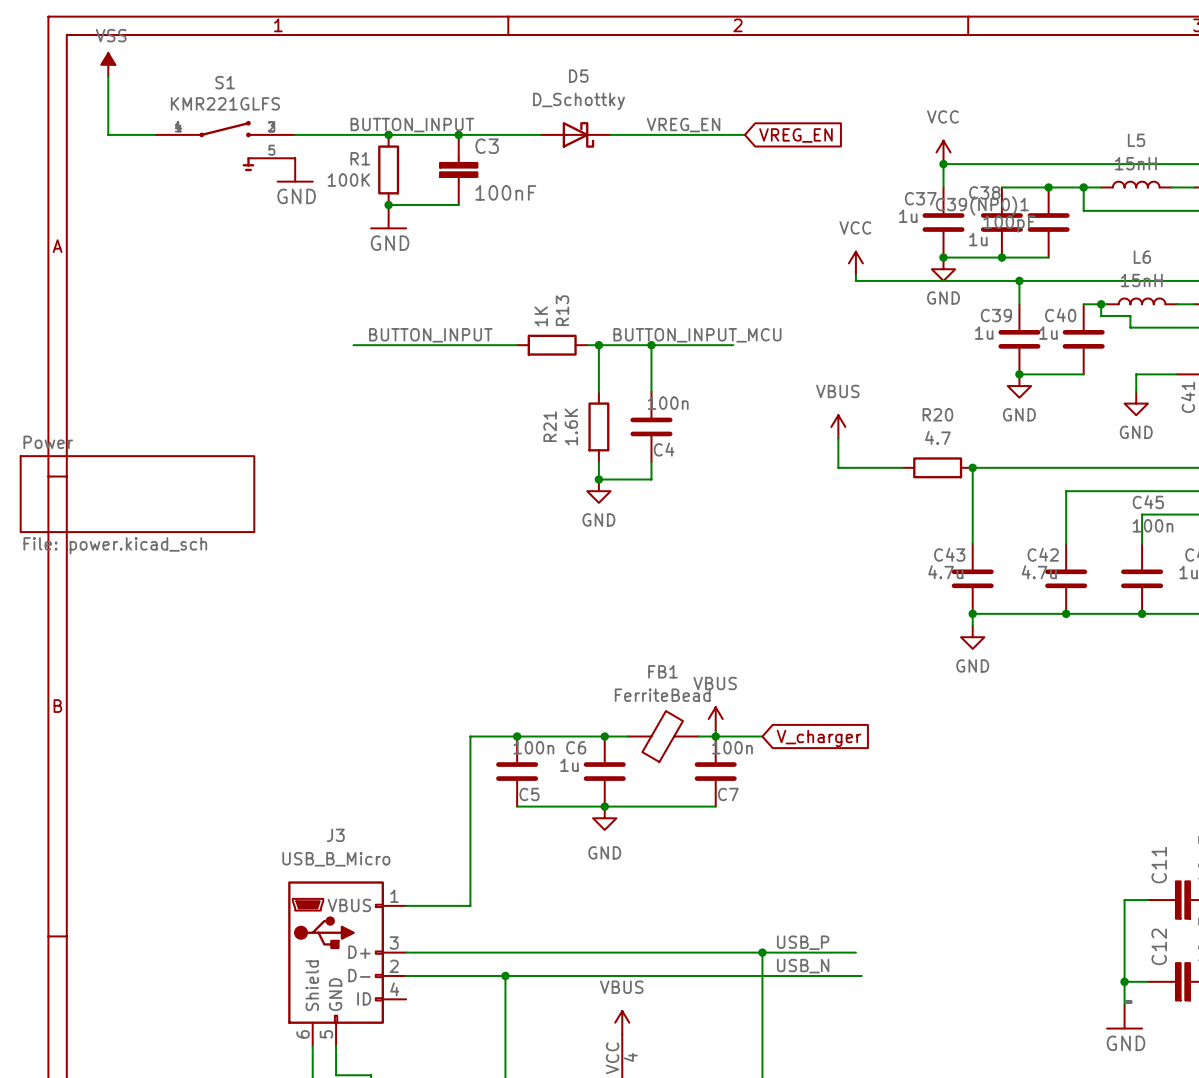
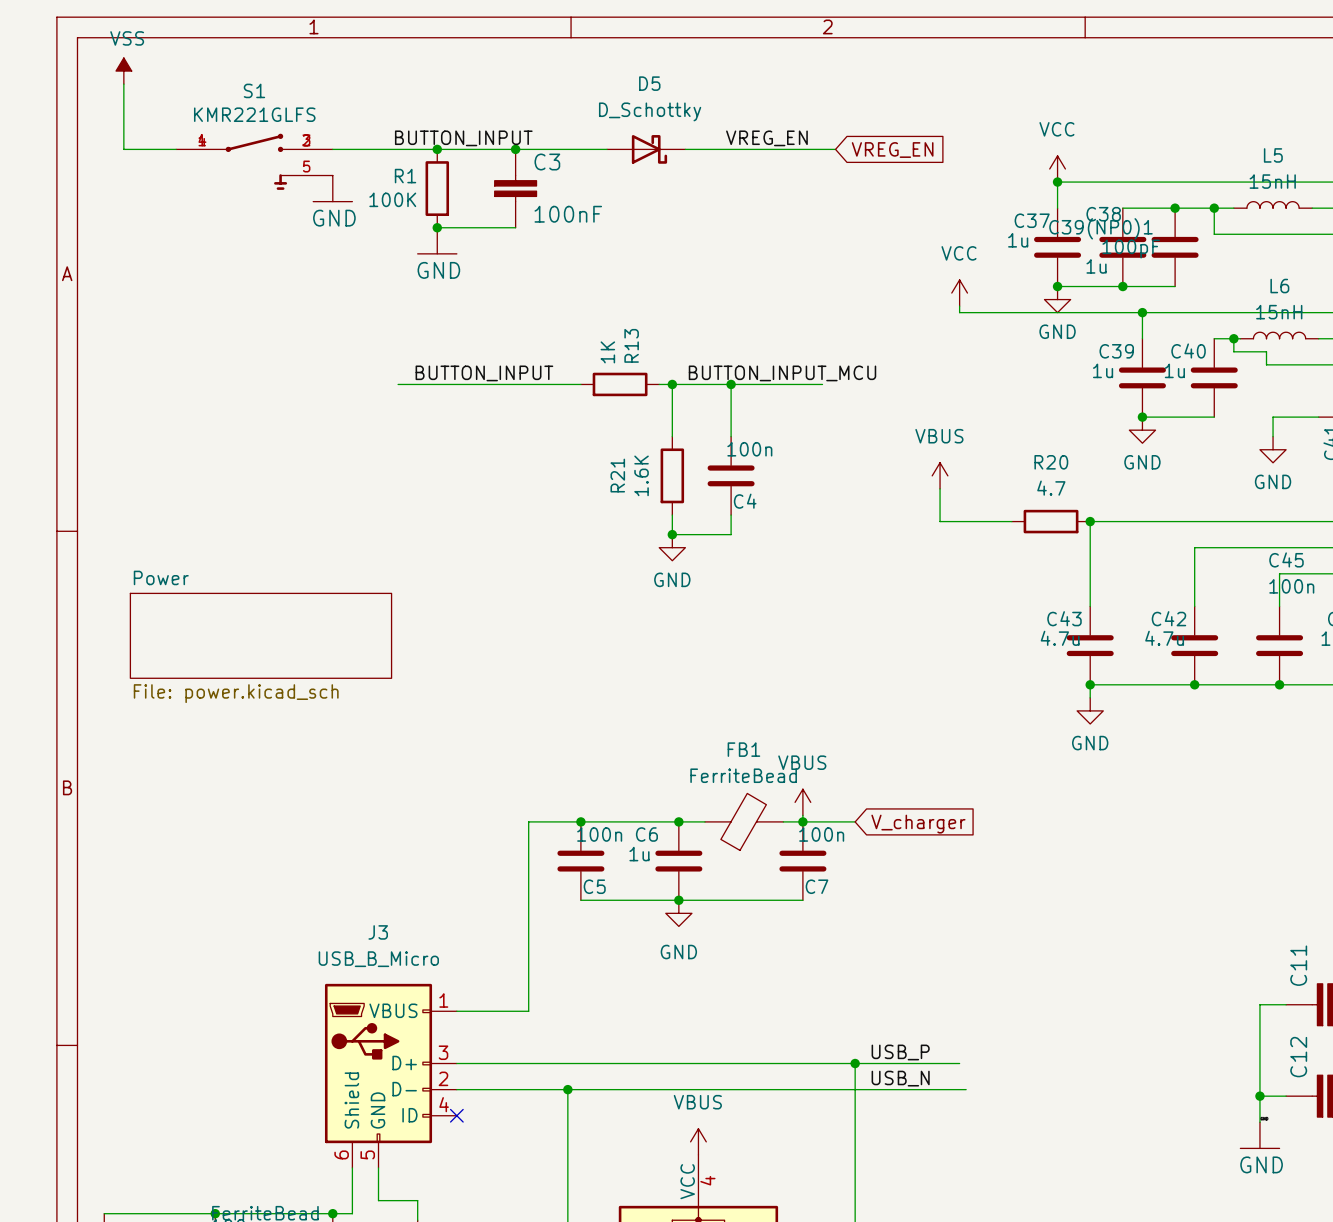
sheet Power position: (137, 494) -> (260, 635)
no-connect mark: none -> (456, 1115)

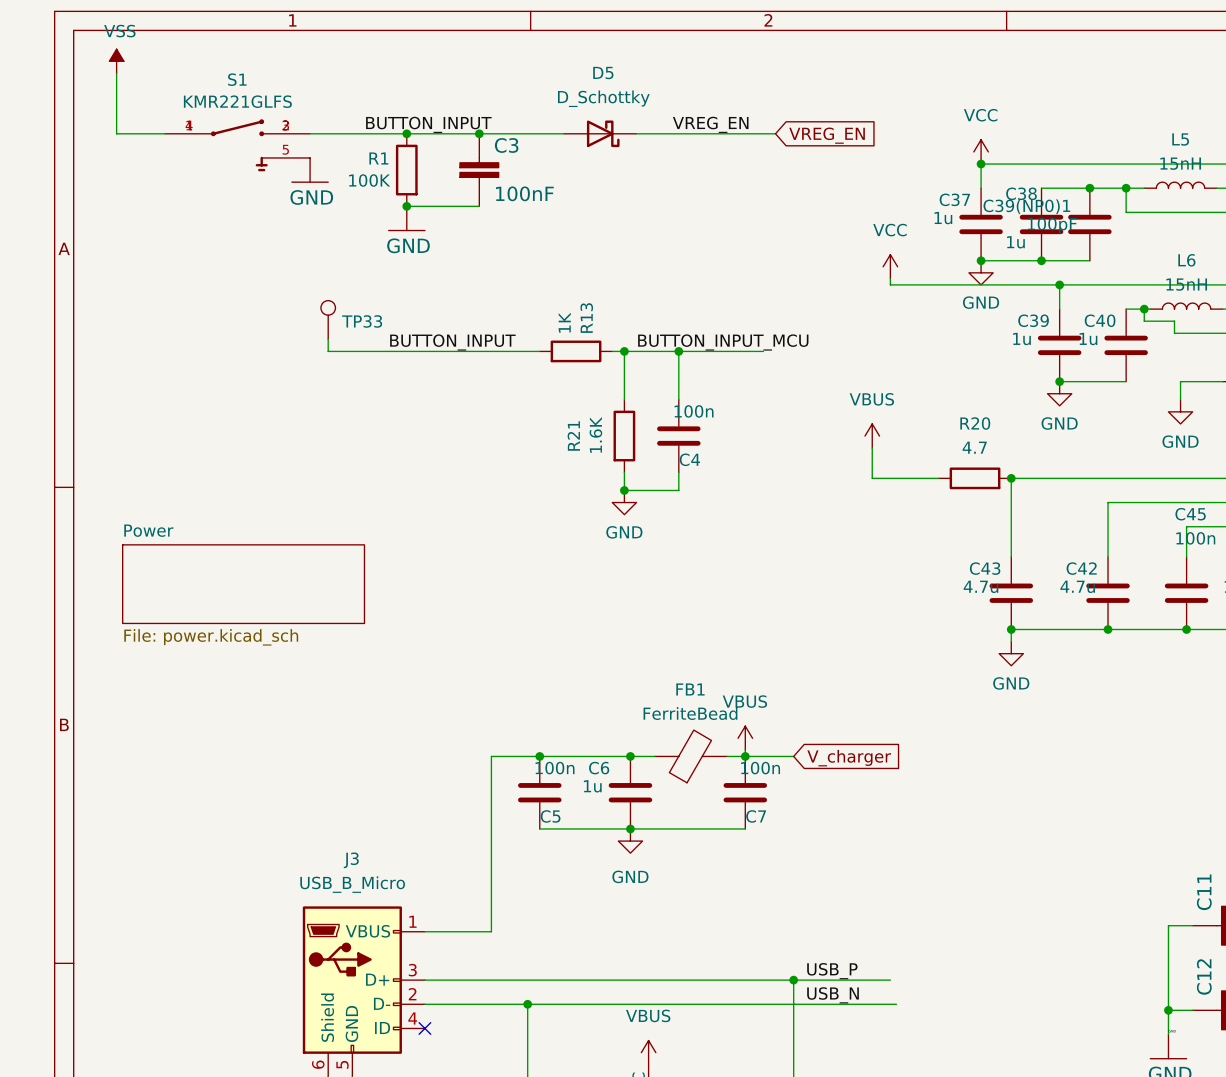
TP33: none -> (328, 319)
wire: none -> (328, 339) (328, 351) (370, 351)

